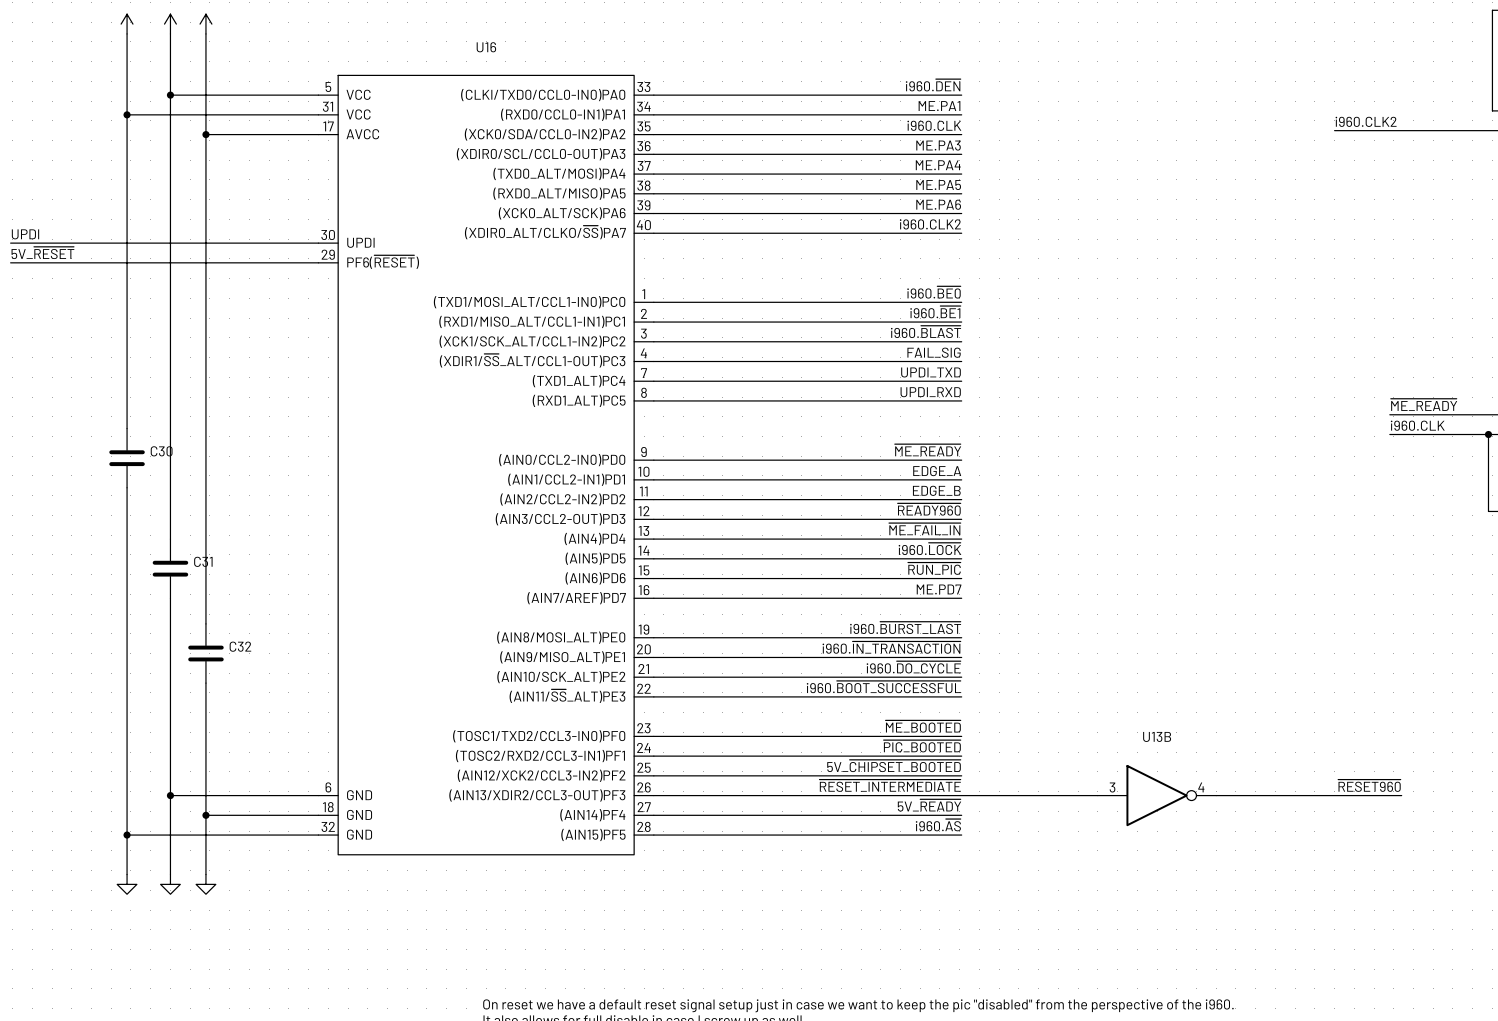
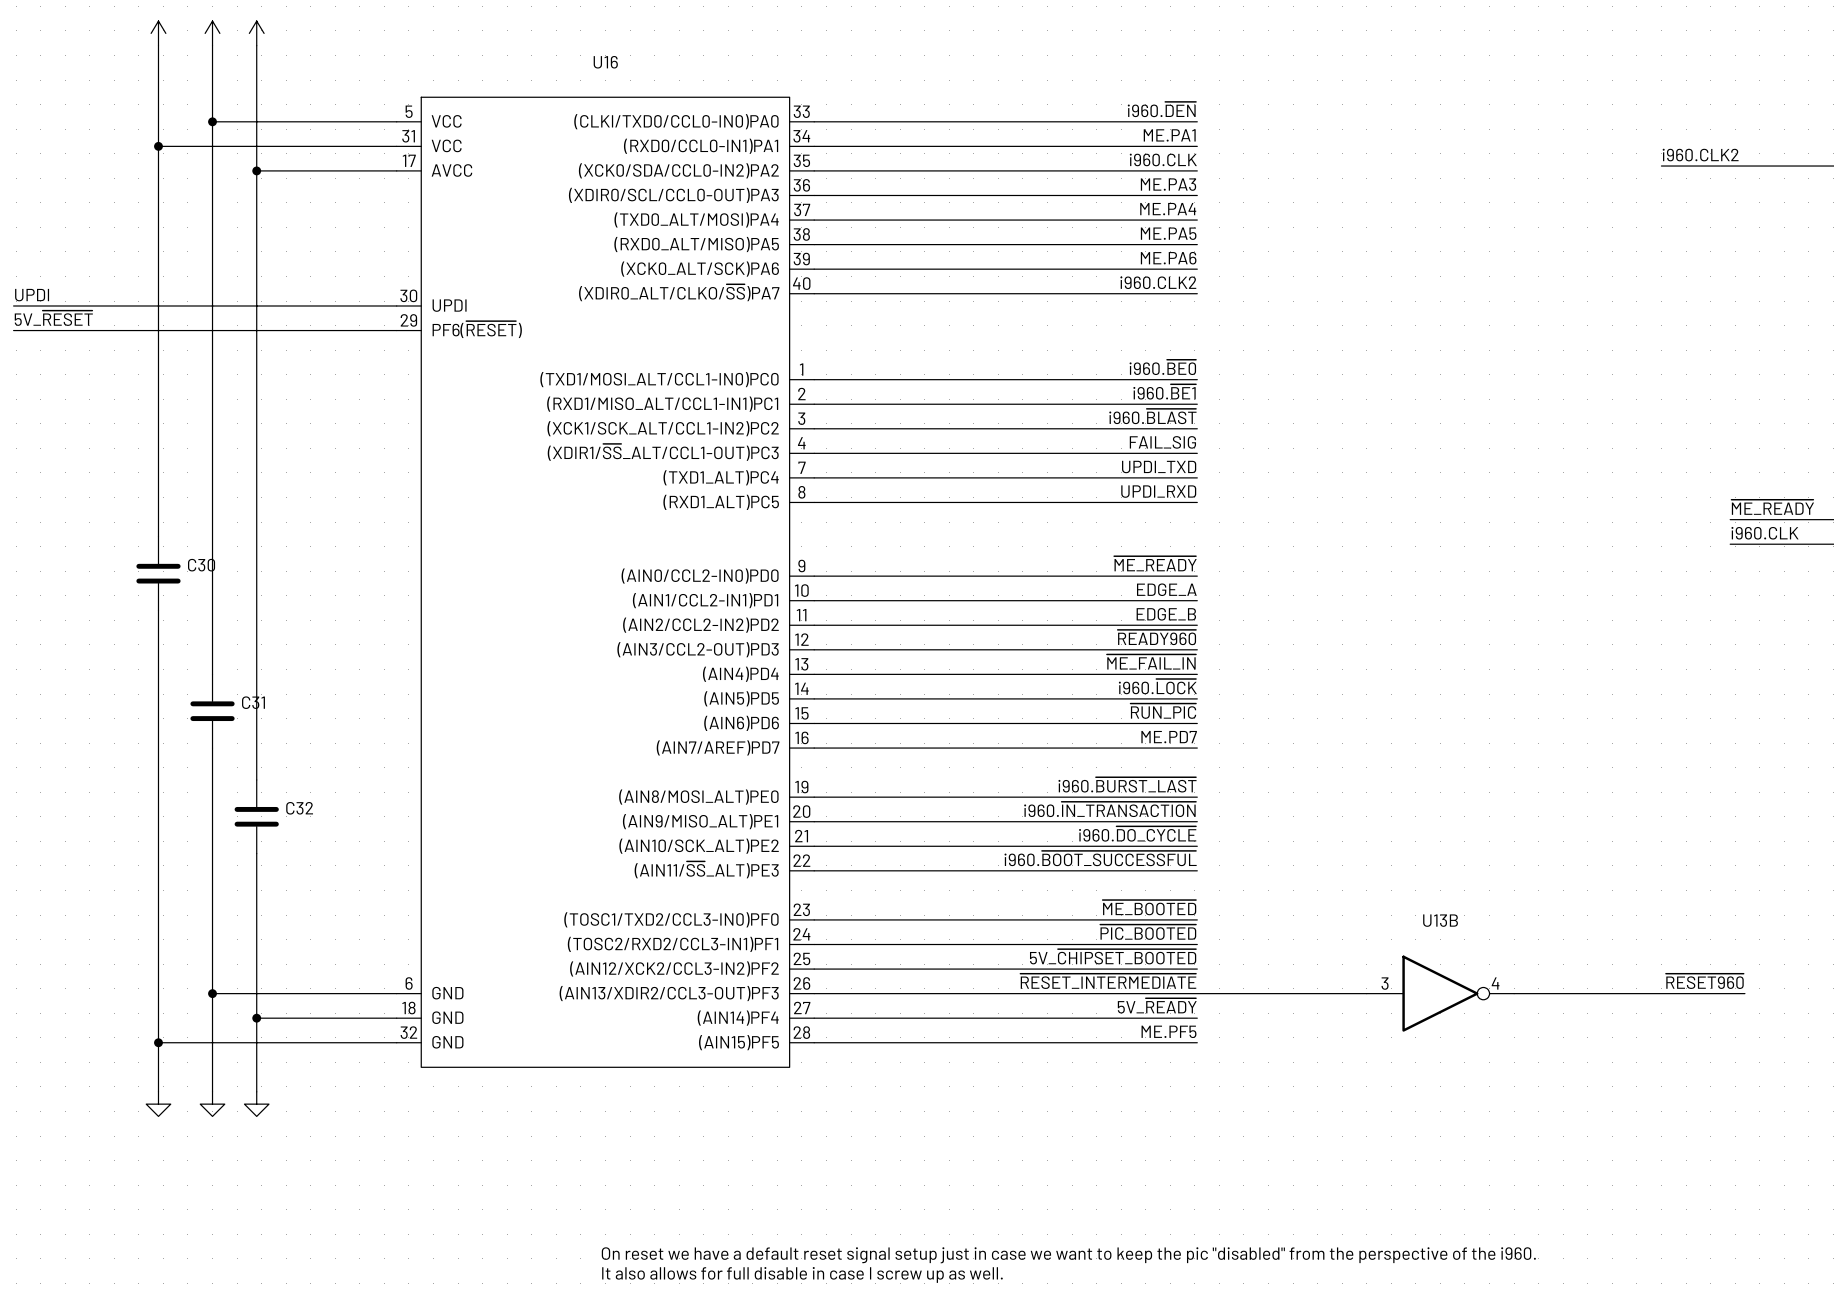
label: i960.~{AS} (938, 825) -> ME.PF5 (1168, 1031)

